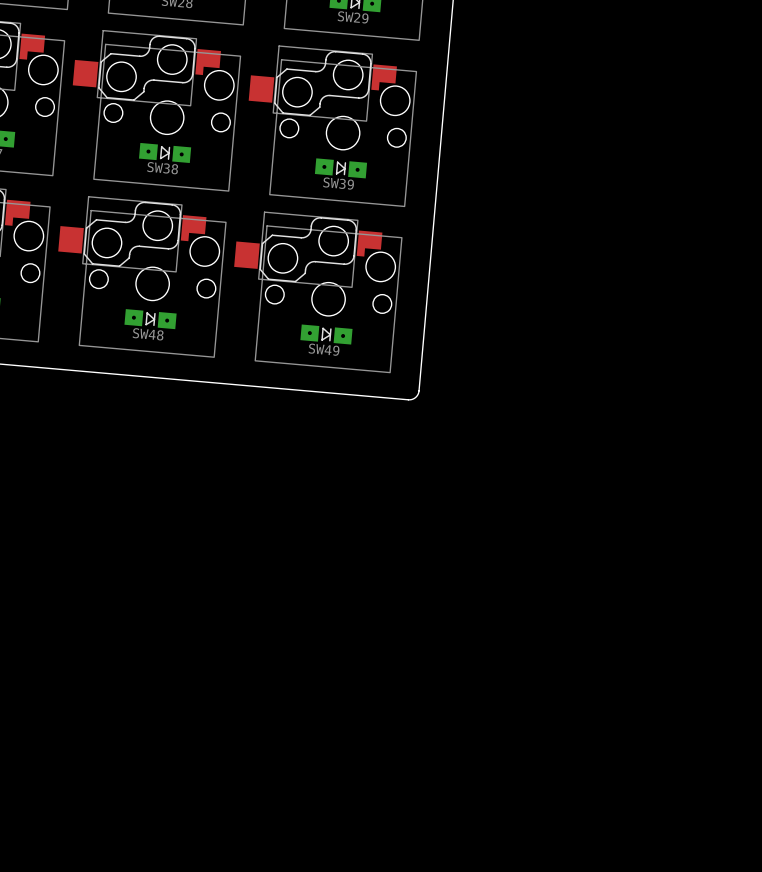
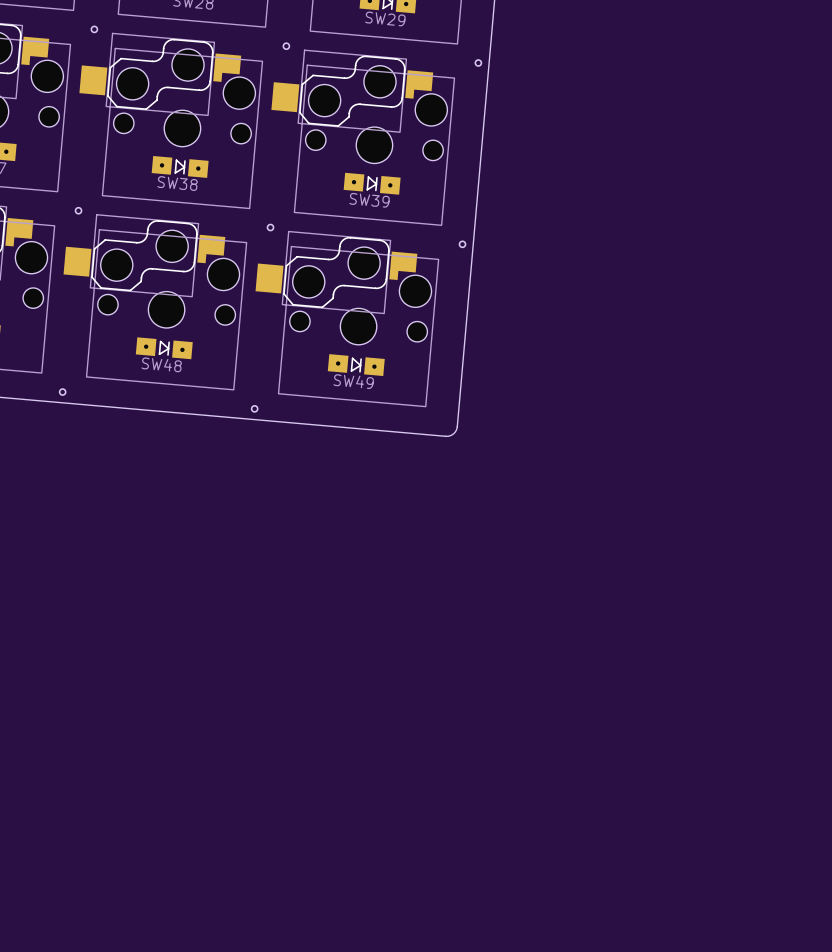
round board edge: none -> [90, 25, 99, 34]
round board edge: none -> [282, 42, 291, 51]
round board edge: none -> [474, 59, 483, 67]
round board edge: none -> [74, 206, 83, 215]
round board edge: none -> [266, 223, 275, 232]
round board edge: none -> [458, 240, 467, 249]
round board edge: none -> [58, 388, 67, 396]
round board edge: none -> [250, 405, 259, 413]

